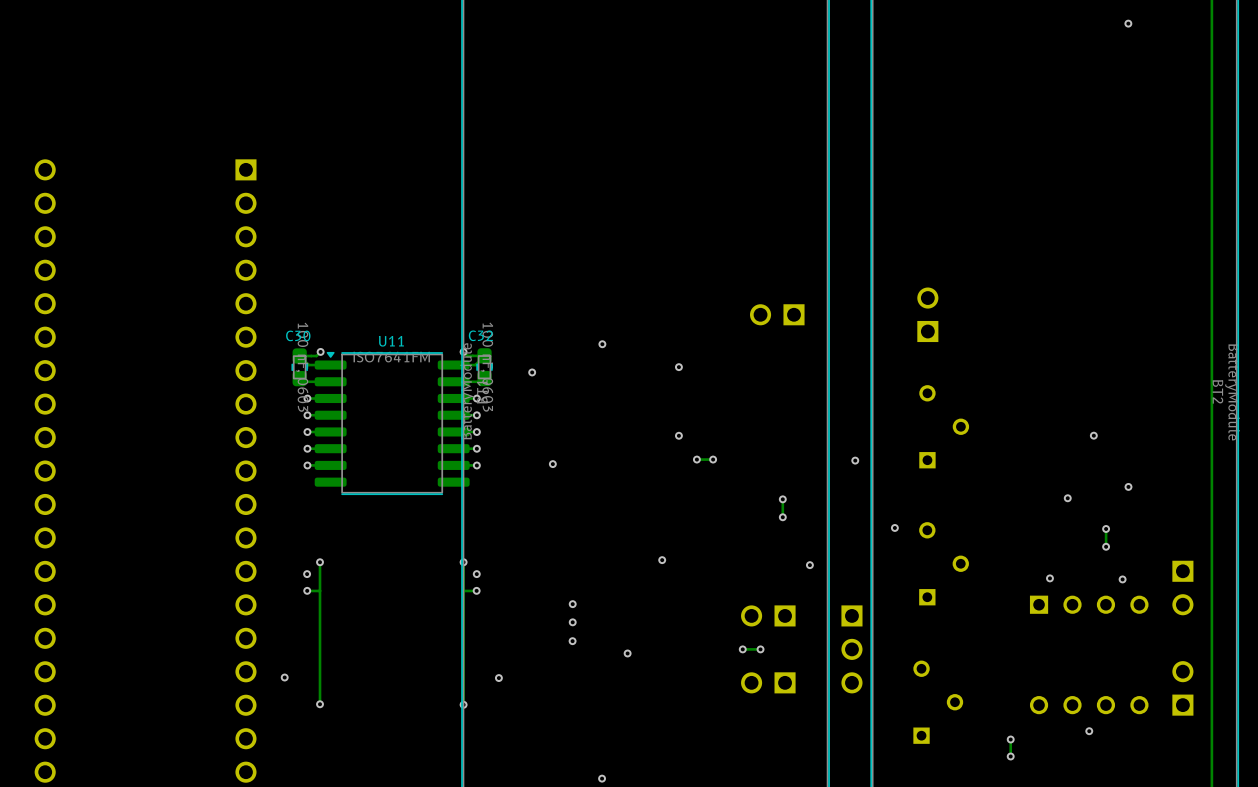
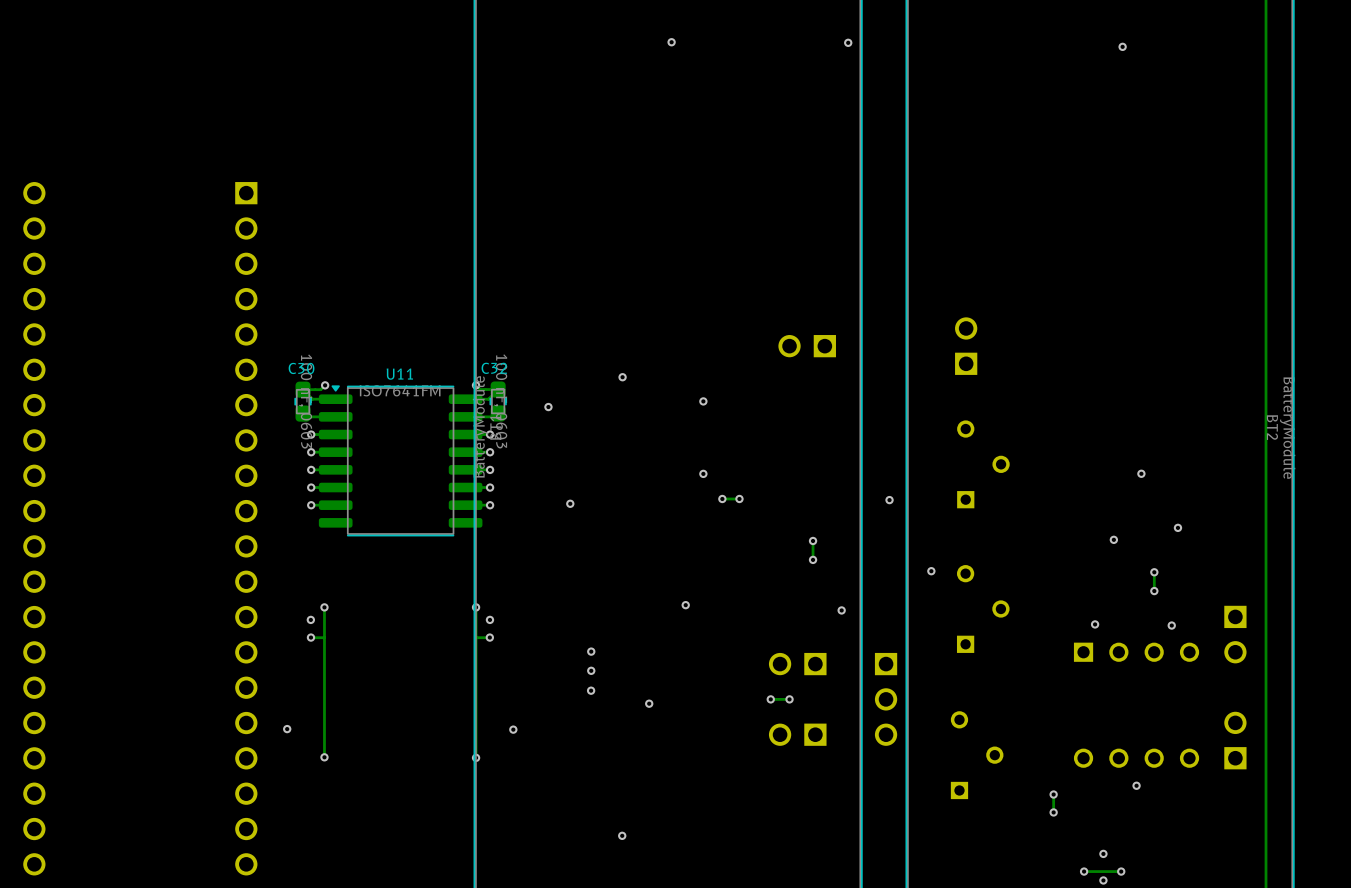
via position: (1128, 23) -> (1122, 46)
via: none -> (671, 42)
via: none -> (848, 42)

